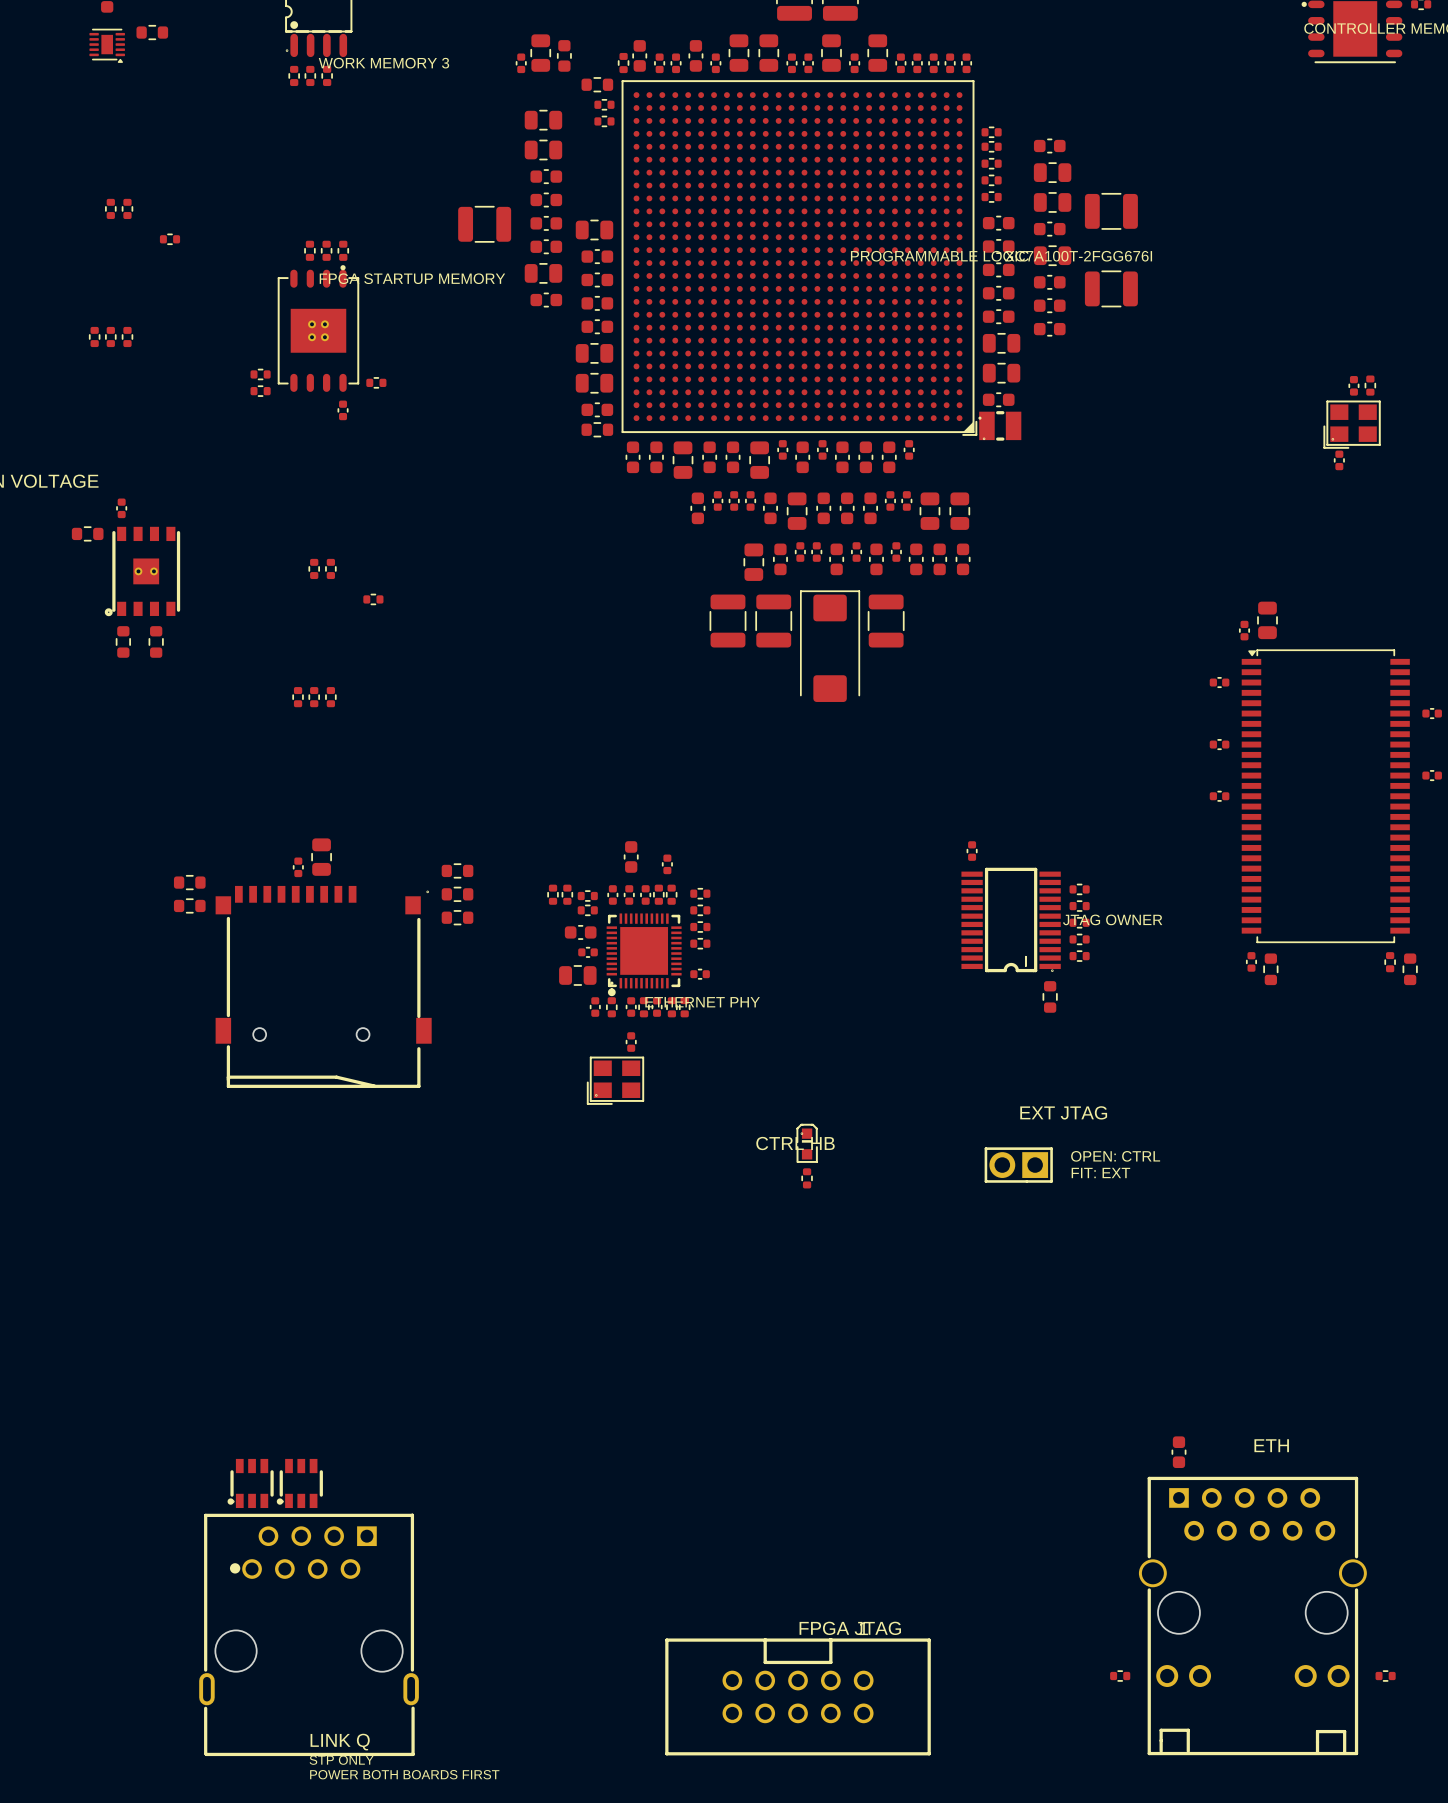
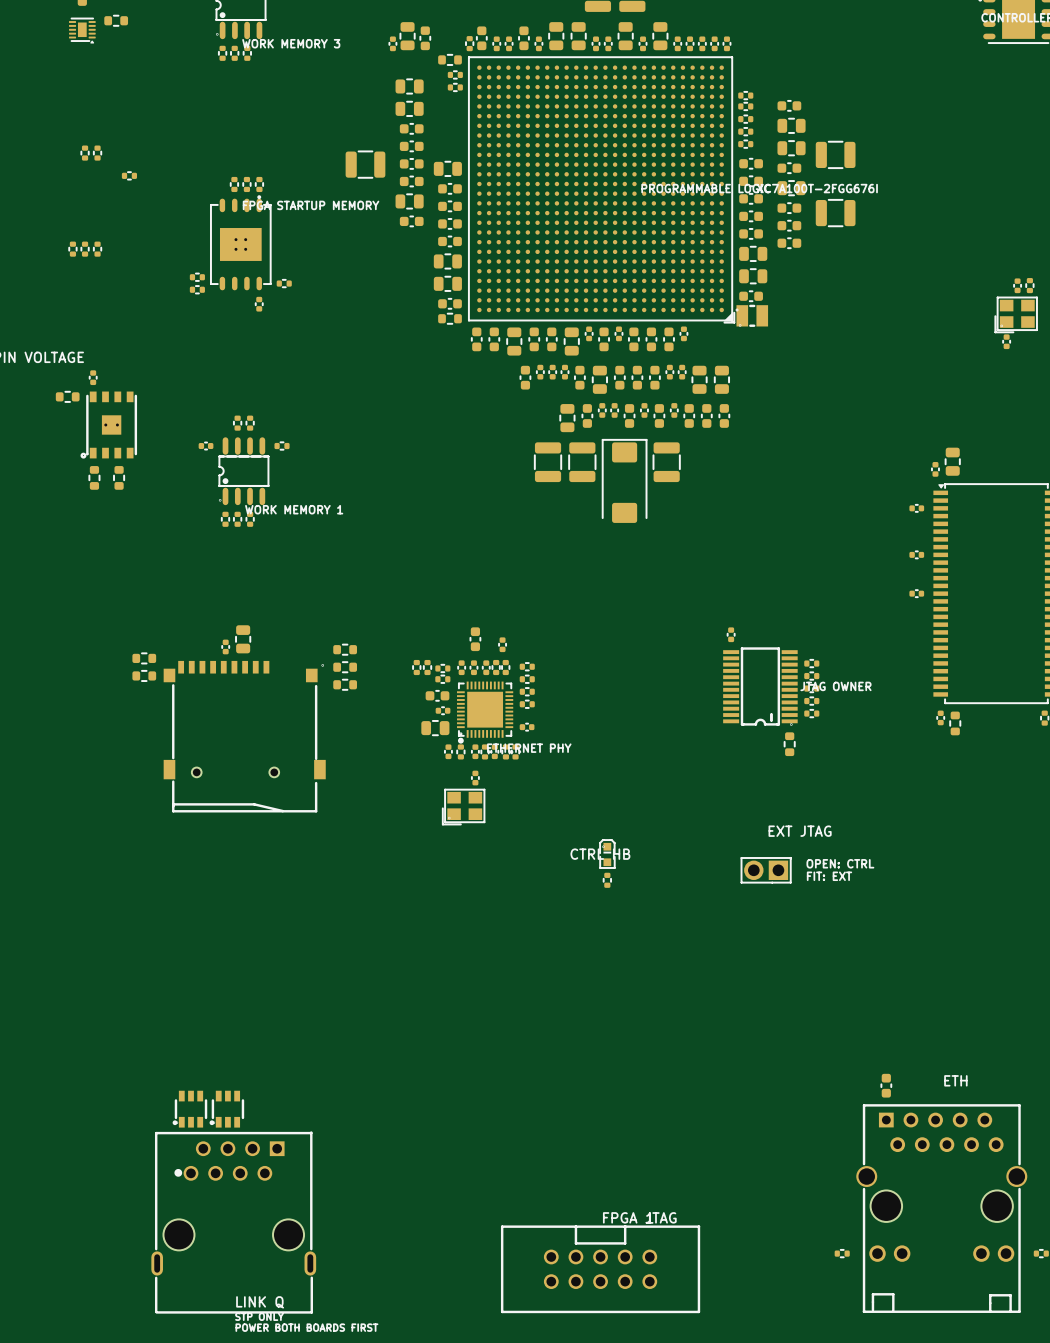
part: none -> (206, 446)
part: none -> (243, 471)

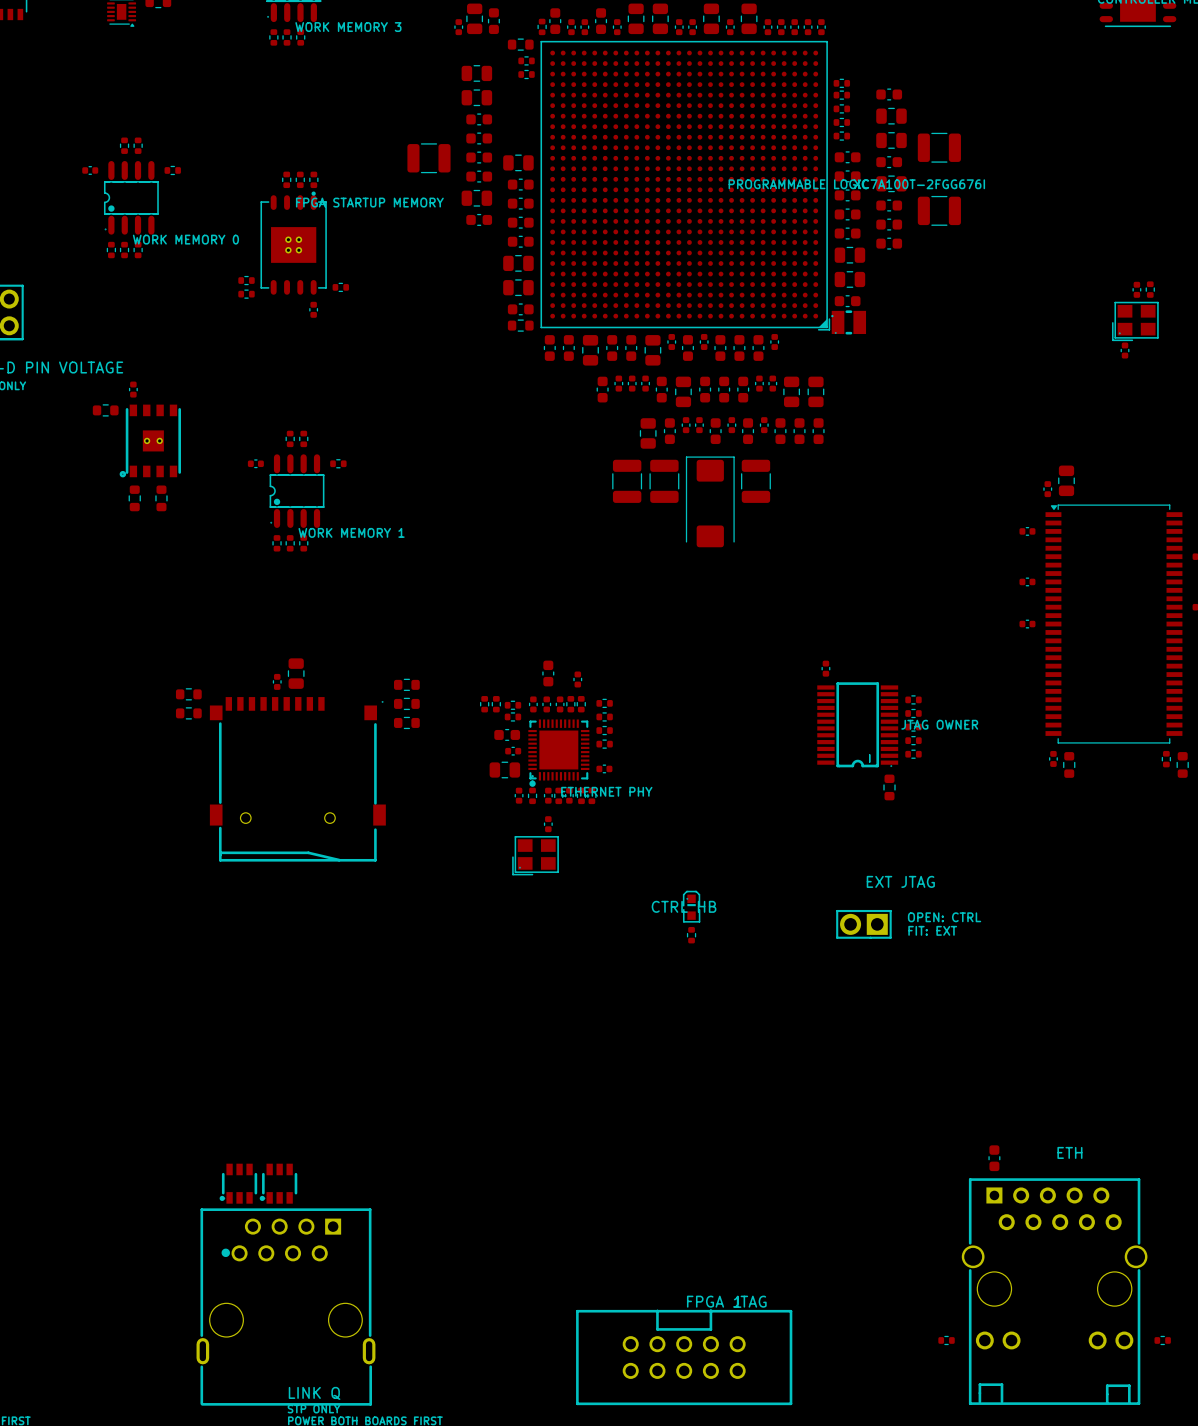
part: none -> (90, 170)
part: none -> (131, 197)

